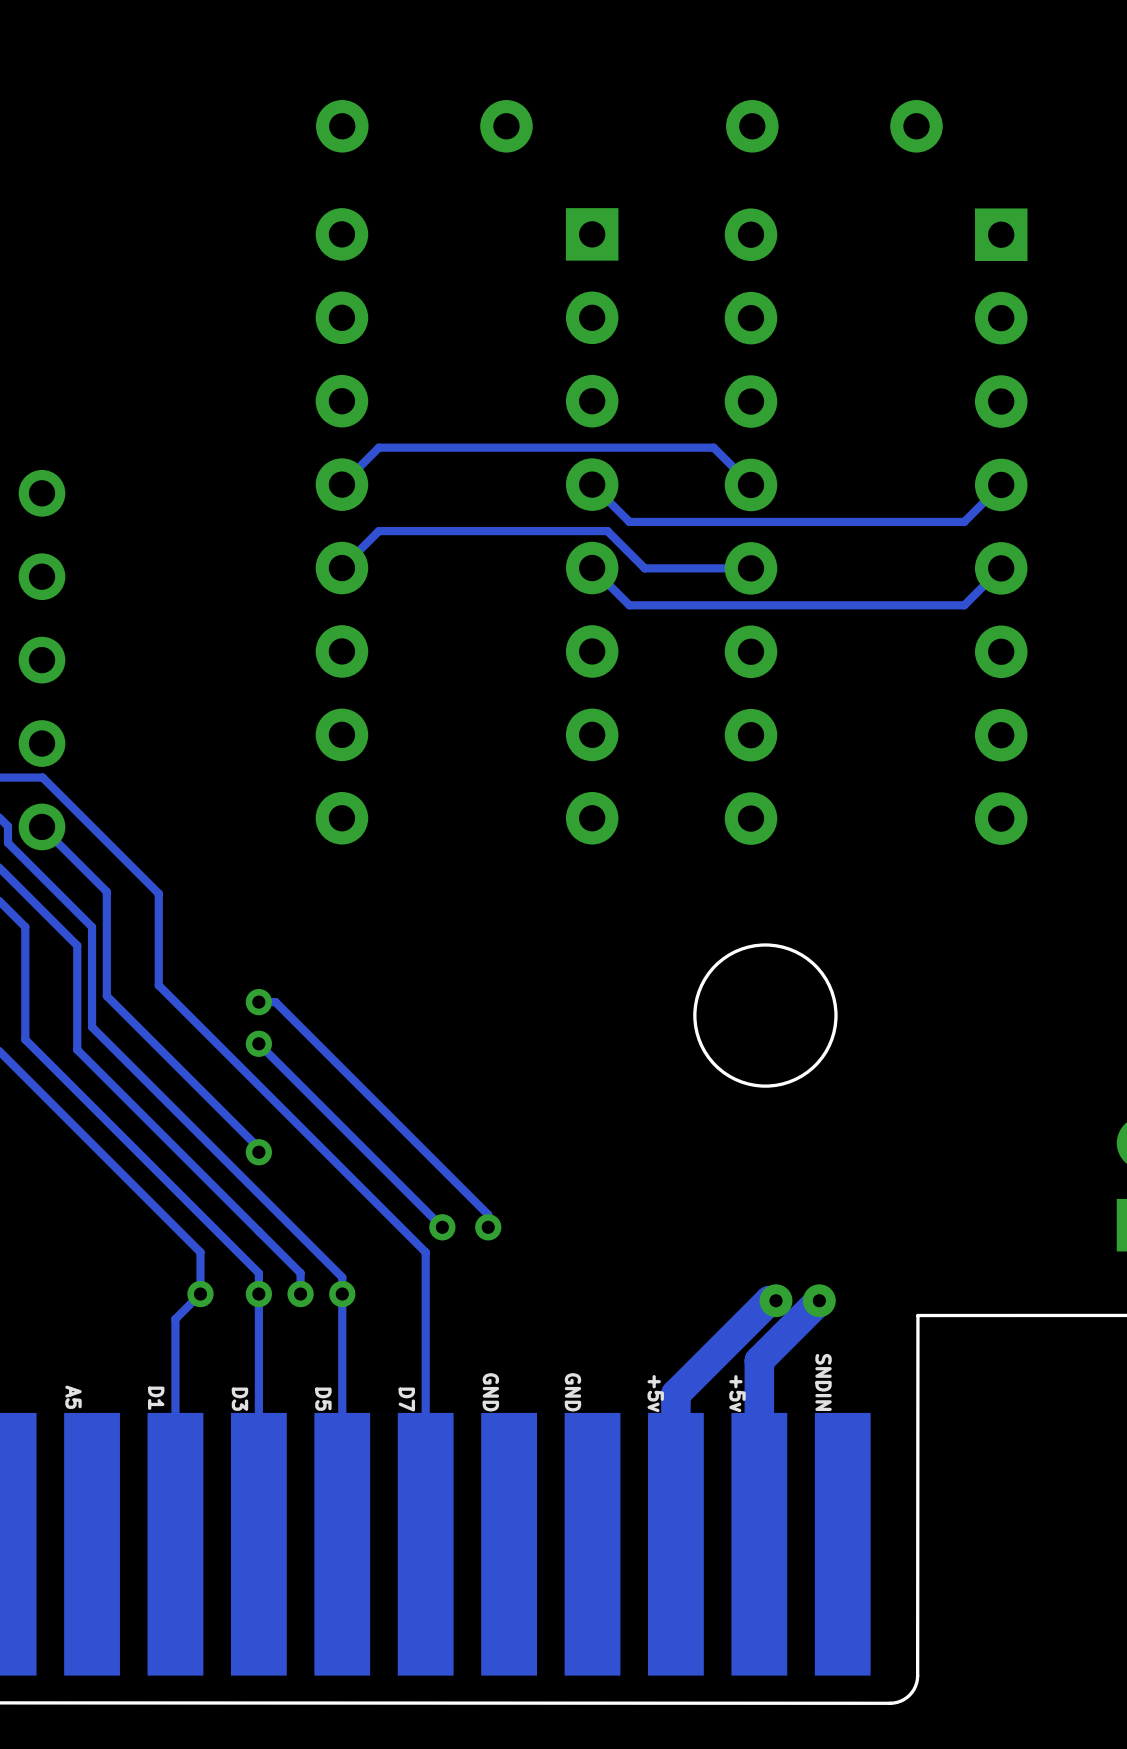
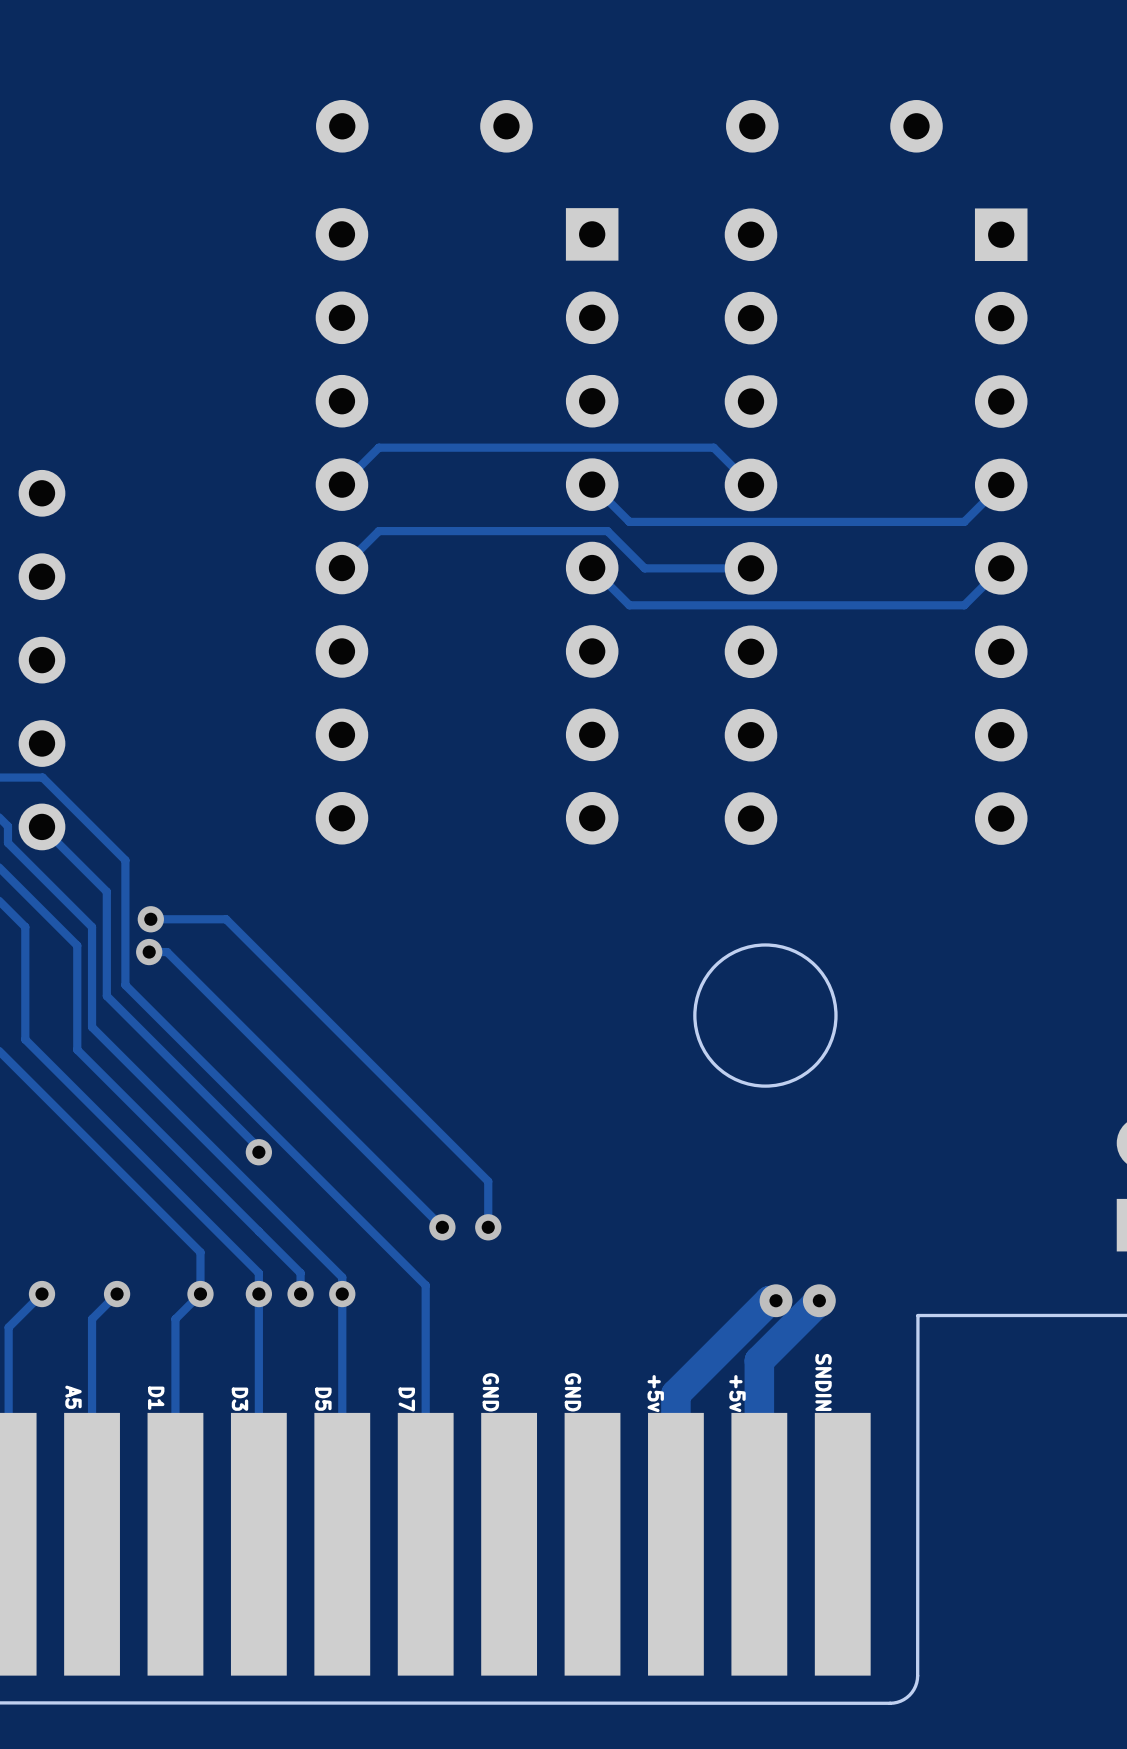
track: (125, 860) (158, 893) (158, 985) (425, 1252) (425, 1285) -> (125, 860) (125, 985) (425, 1285)
via: none -> (150, 919)
track: none -> (149, 952) (167, 952) (258, 1043)
via: none -> (149, 952)
track: (258, 1002) (275, 1002) (488, 1214) -> (150, 919) (226, 919) (488, 1181) (488, 1214)
via: (258, 1002) -> none
via: (258, 1043) -> none
track: none -> (42, 1294) (8, 1327) (8, 1544)
via: none -> (42, 1294)
track: none -> (117, 1294) (92, 1319) (92, 1544)
via: none -> (117, 1294)

